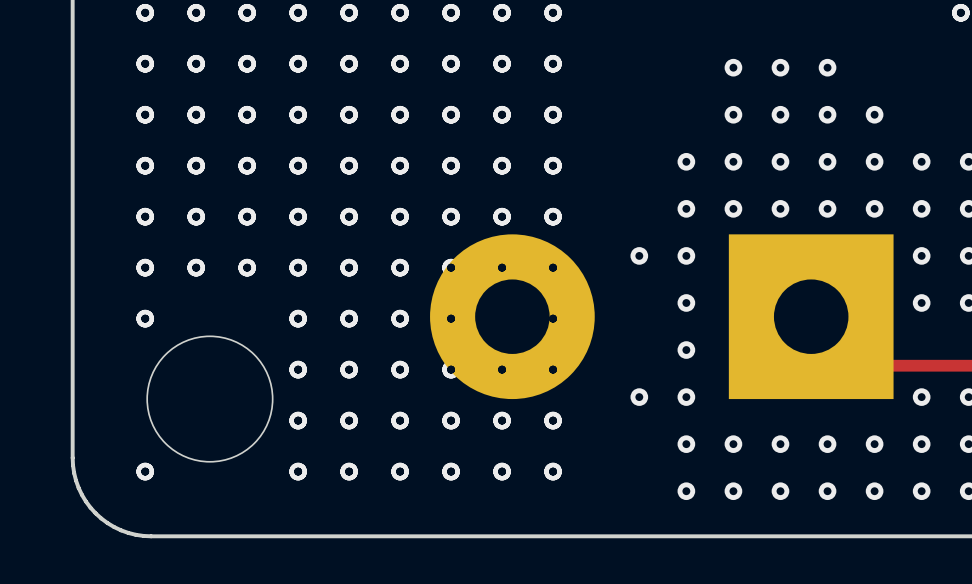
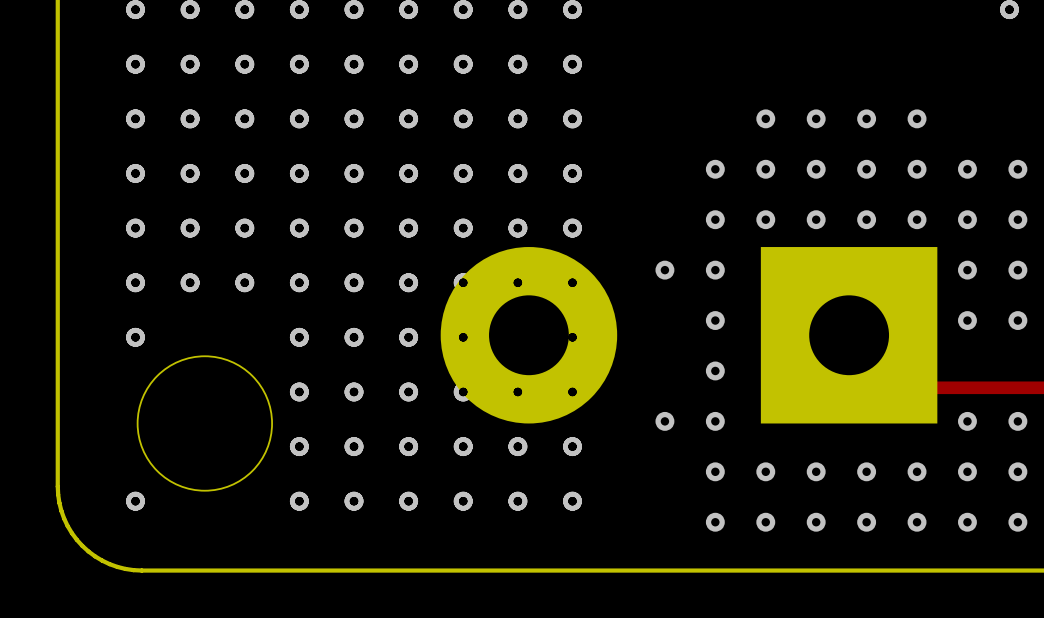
via: (733, 67) -> none
via: (780, 67) -> none
via: (827, 67) -> none

